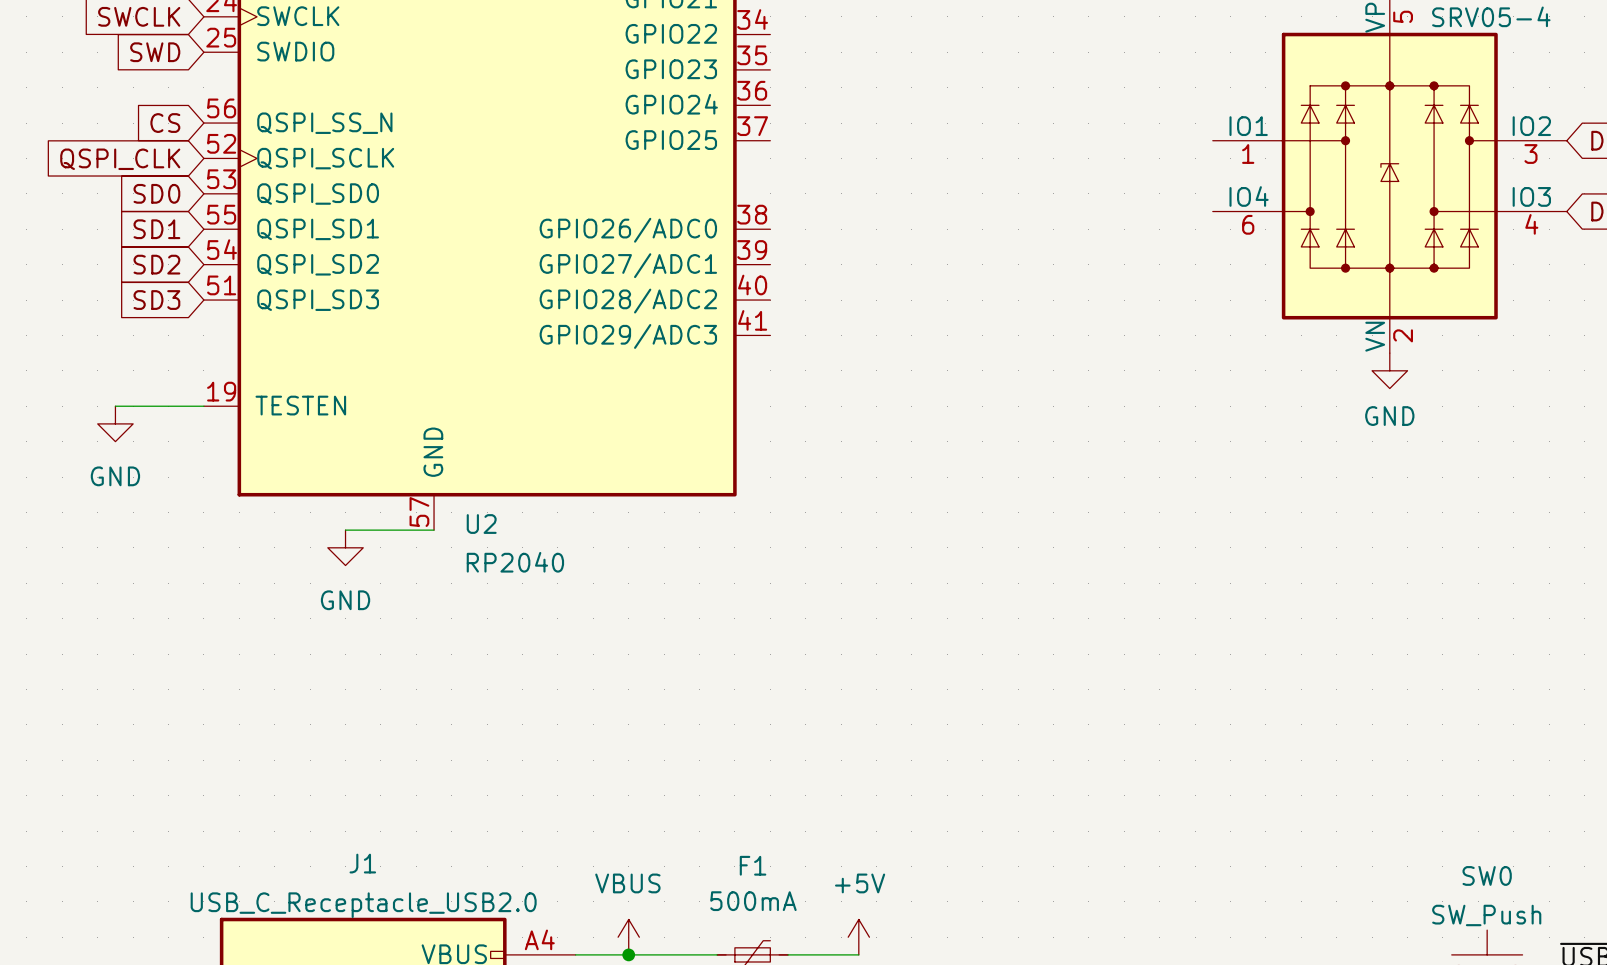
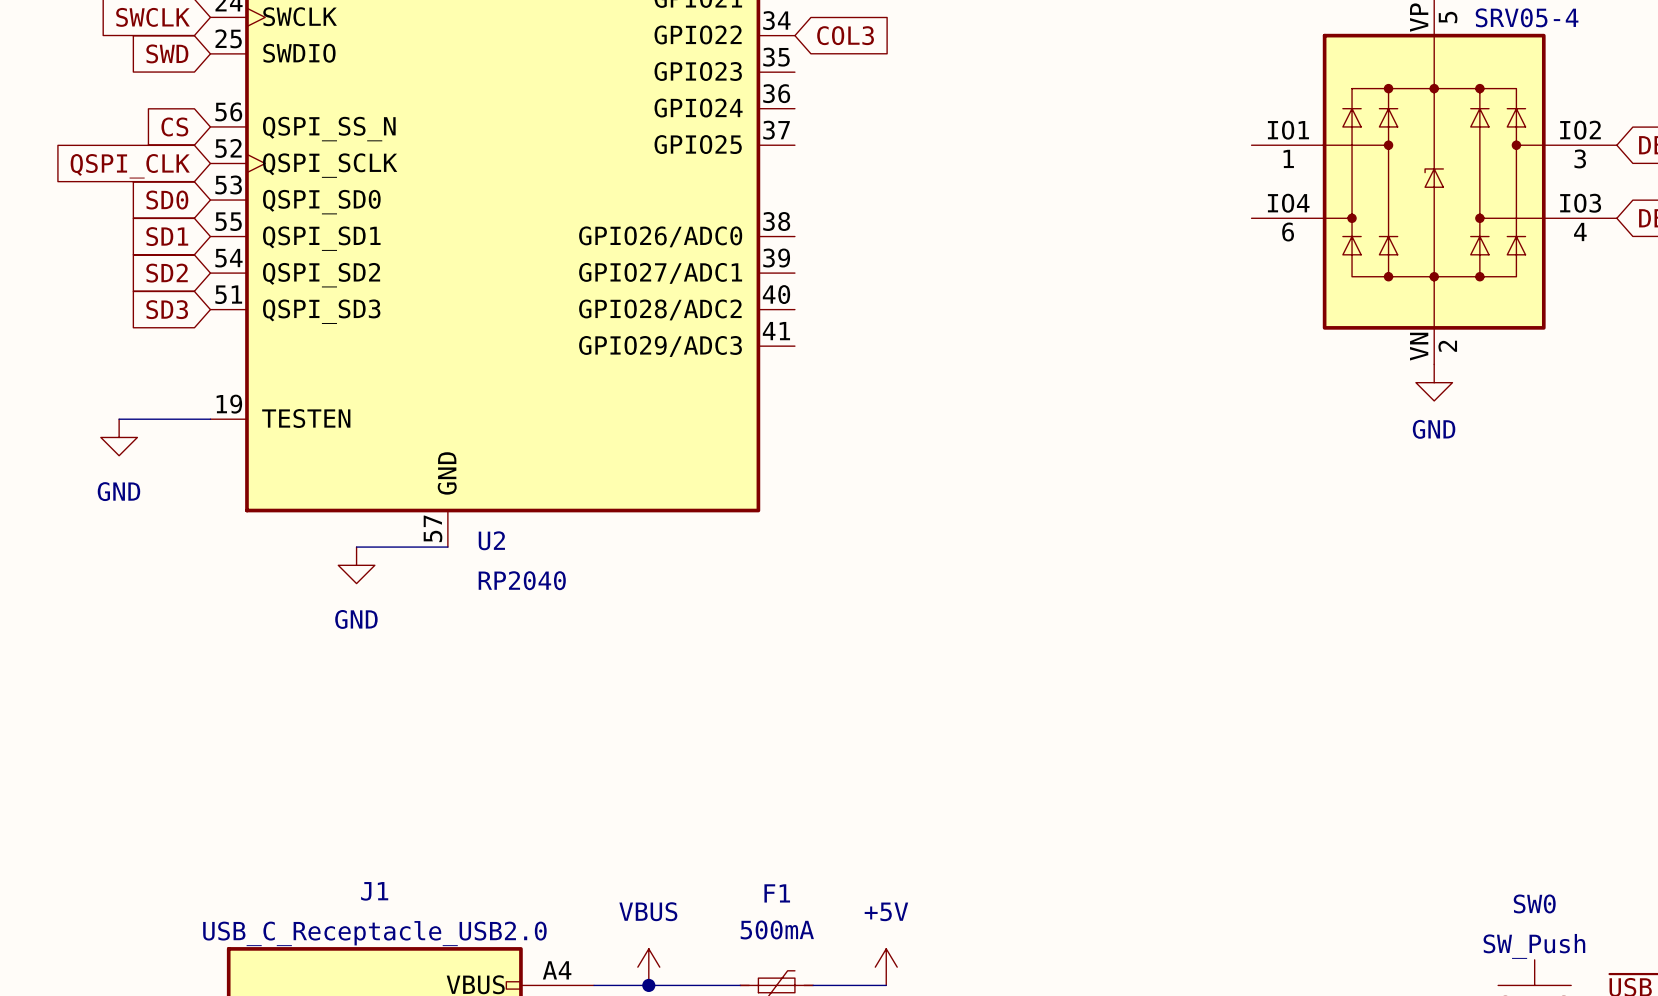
global label: none -> COL3 (845, 35)

